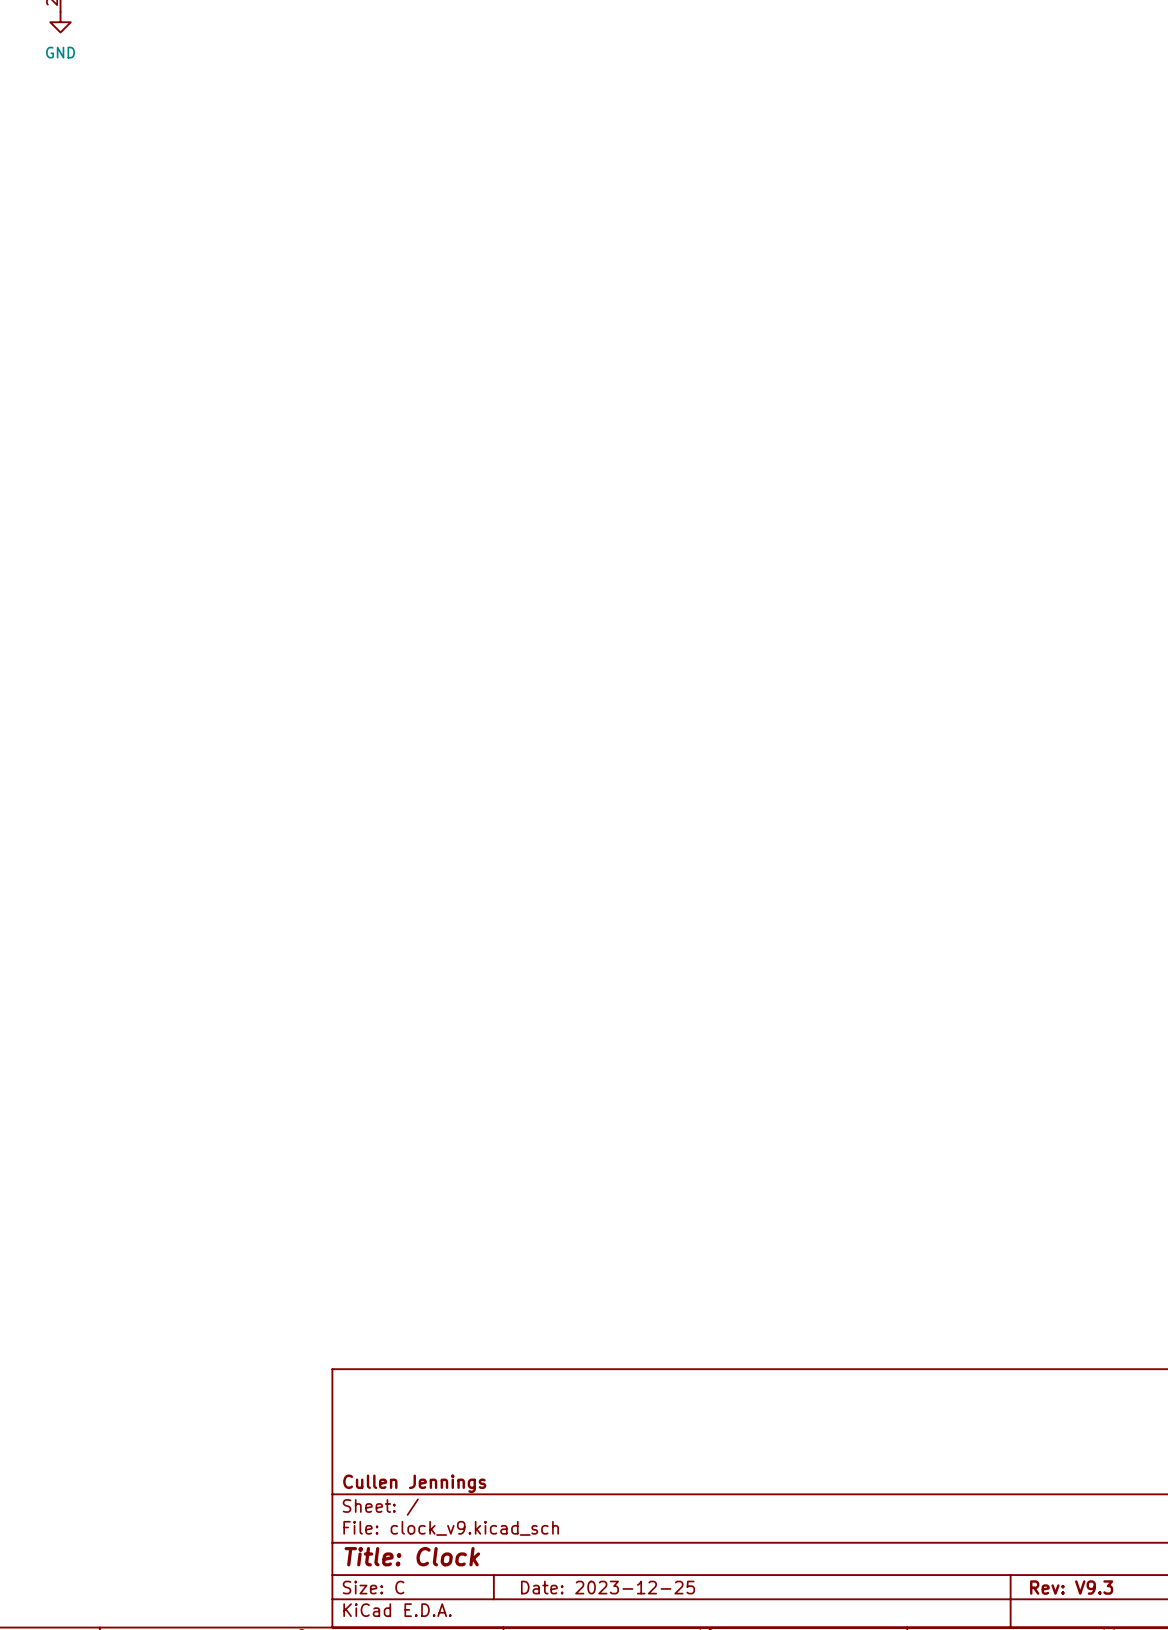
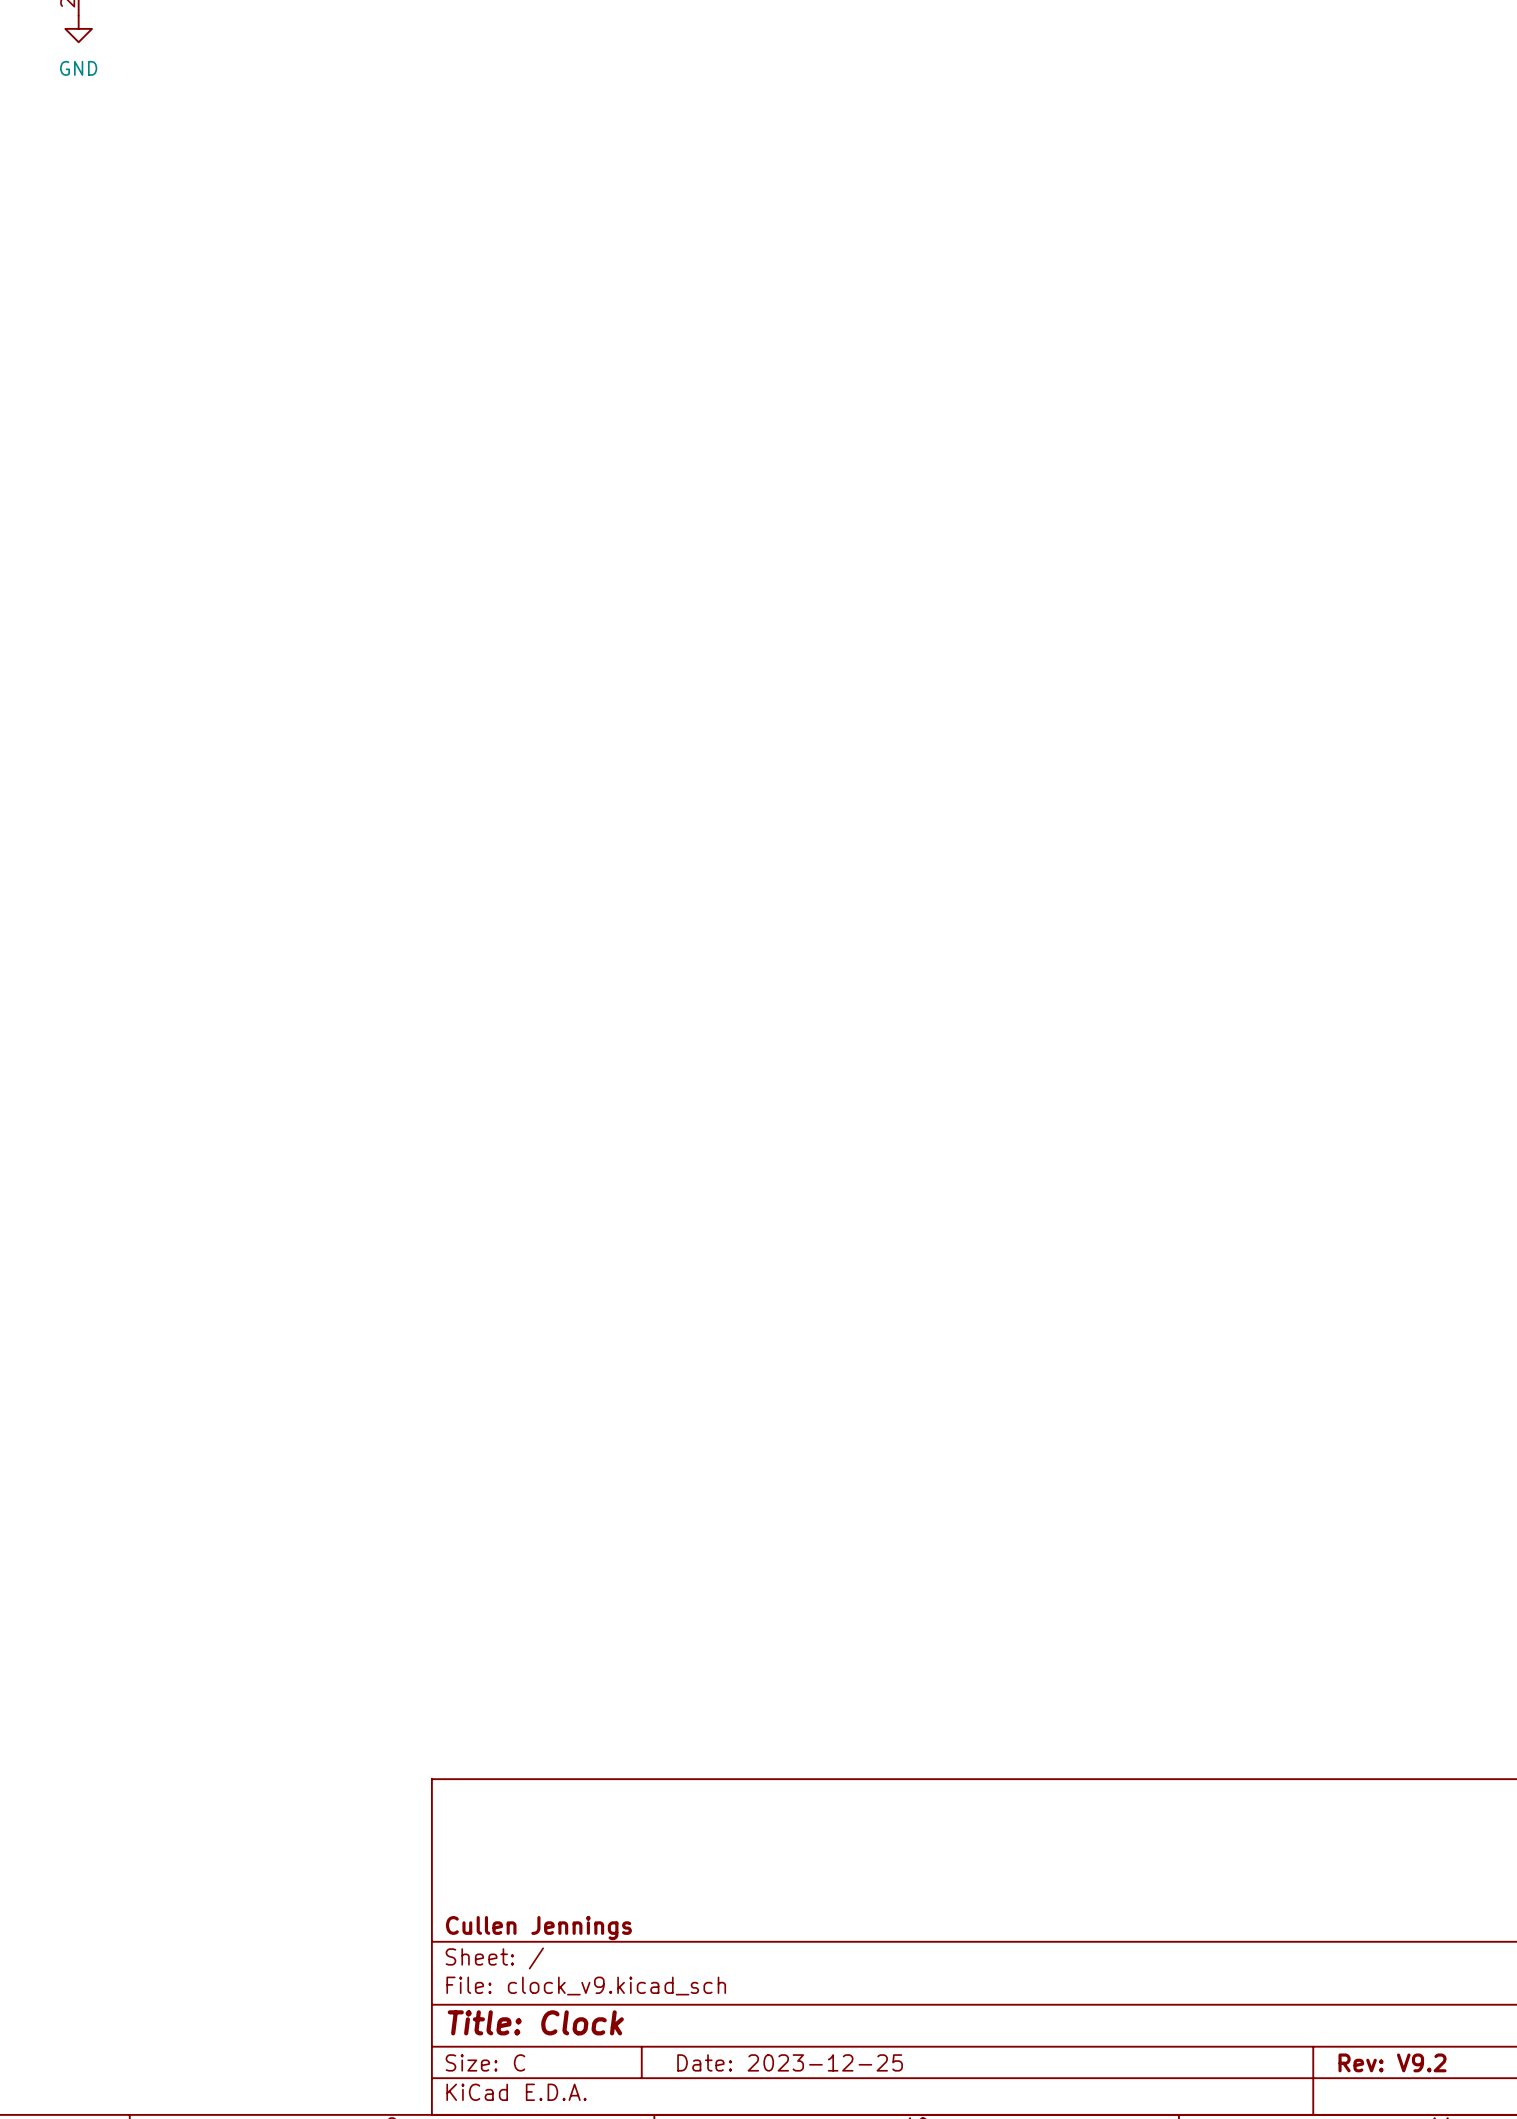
title block: Rev: V9.3 (1071, 1587) -> Rev: V9.2 (1392, 2062)

